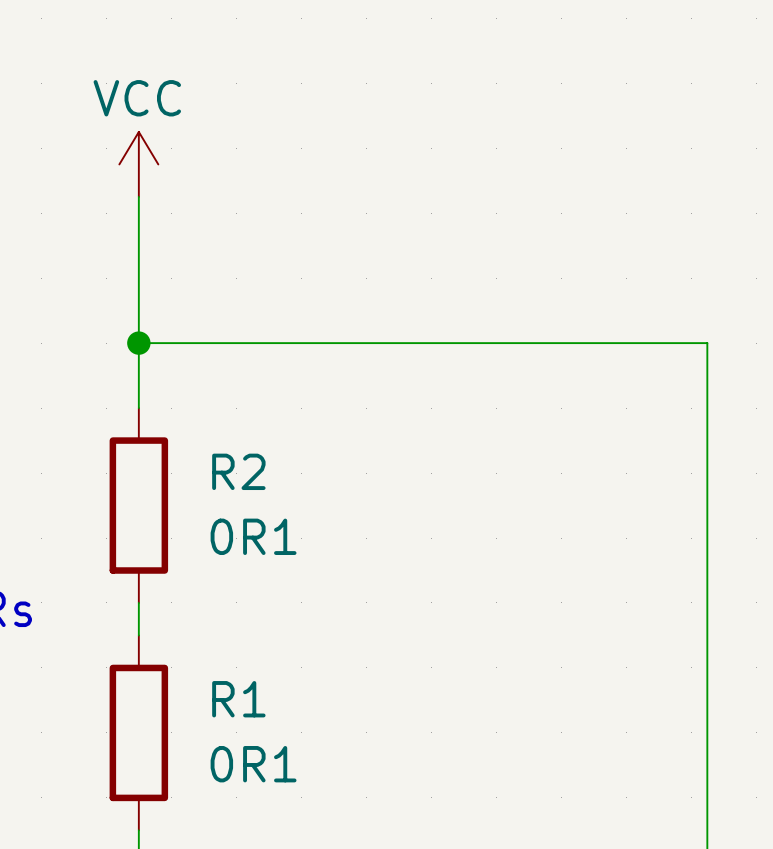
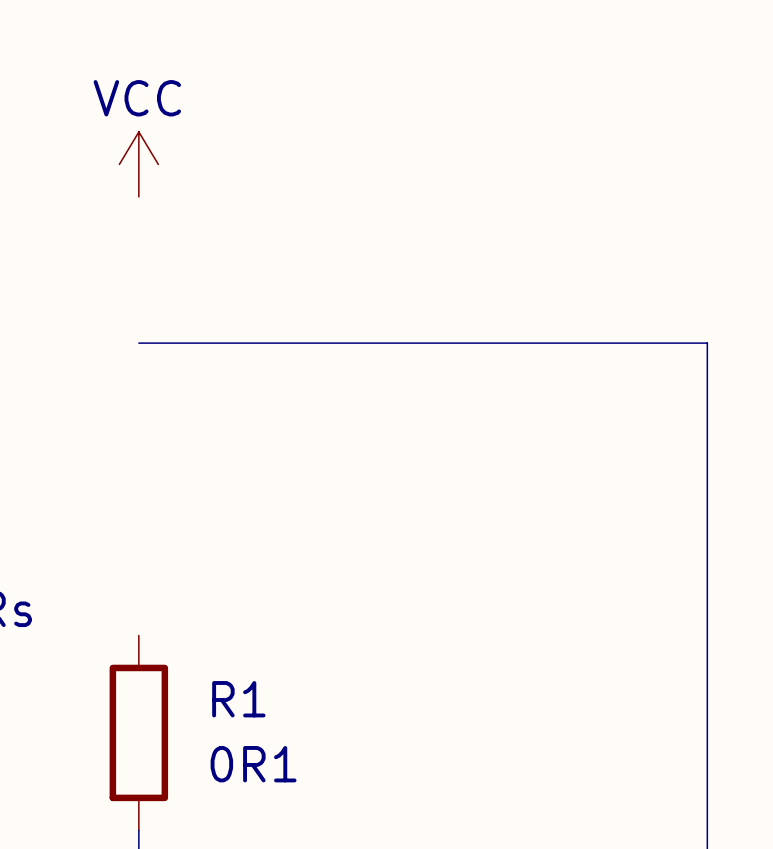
wire: (138, 196) (138, 408) -> none
junction: (138, 343) -> none
R2: 0R1 (138, 505) -> none
wire: (138, 602) (138, 635) -> none

